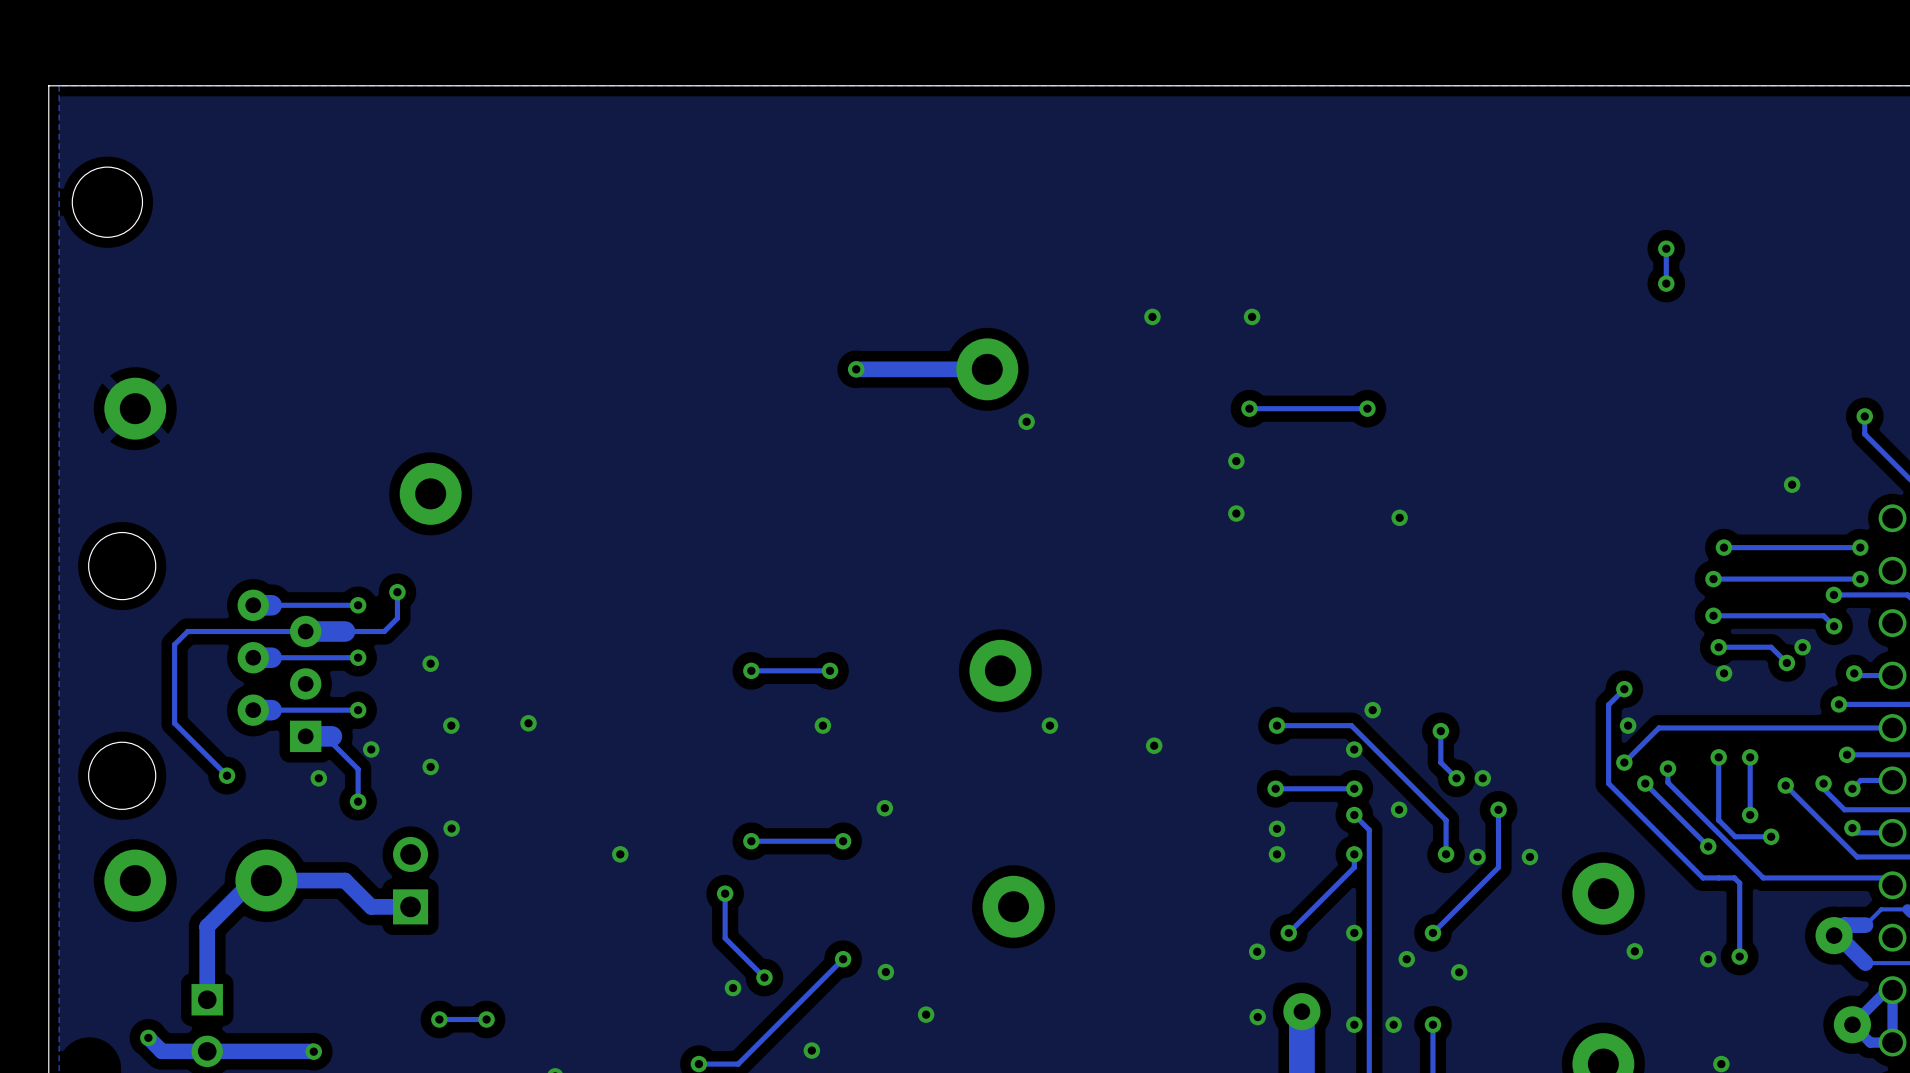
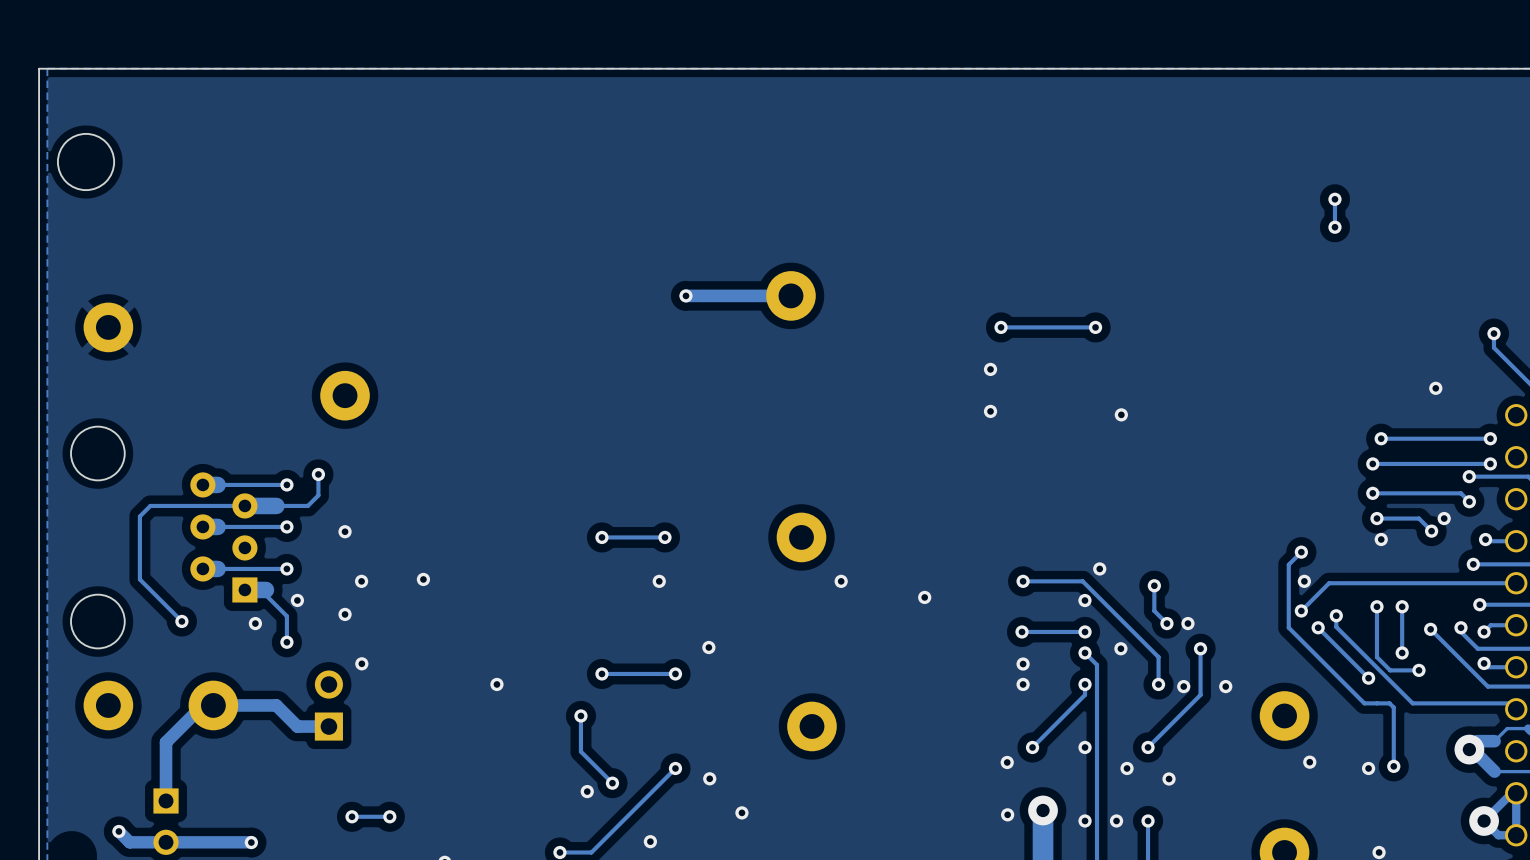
via: (1152, 316) -> none
via: (1252, 316) -> none
via: (1026, 421) -> none

